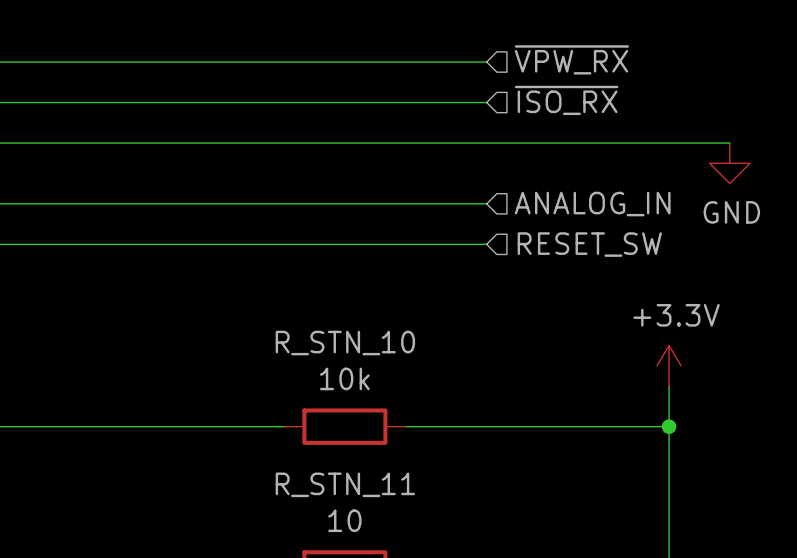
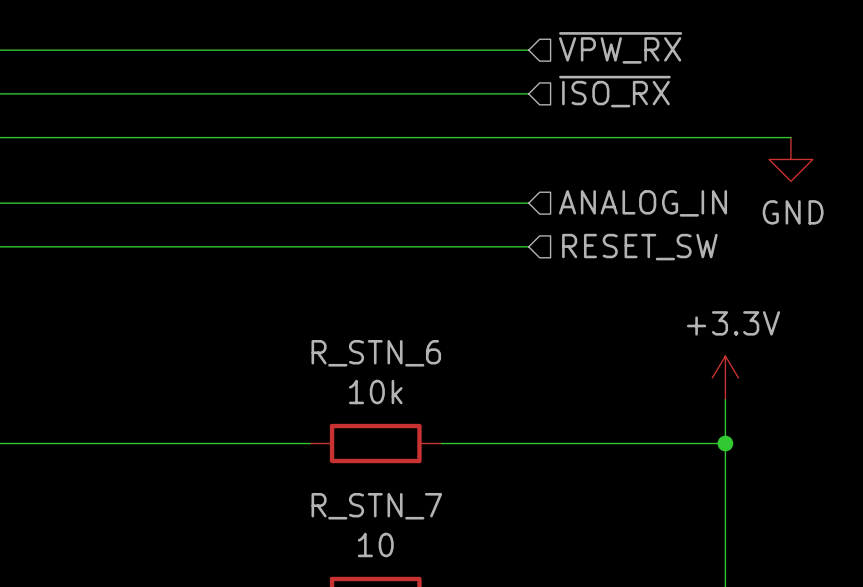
R_STN_10 name: R_STN_10 (345, 343) -> R_STN_6 (376, 353)
R_STN_11 name: R_STN_11 (345, 484) -> R_STN_7 (376, 506)

